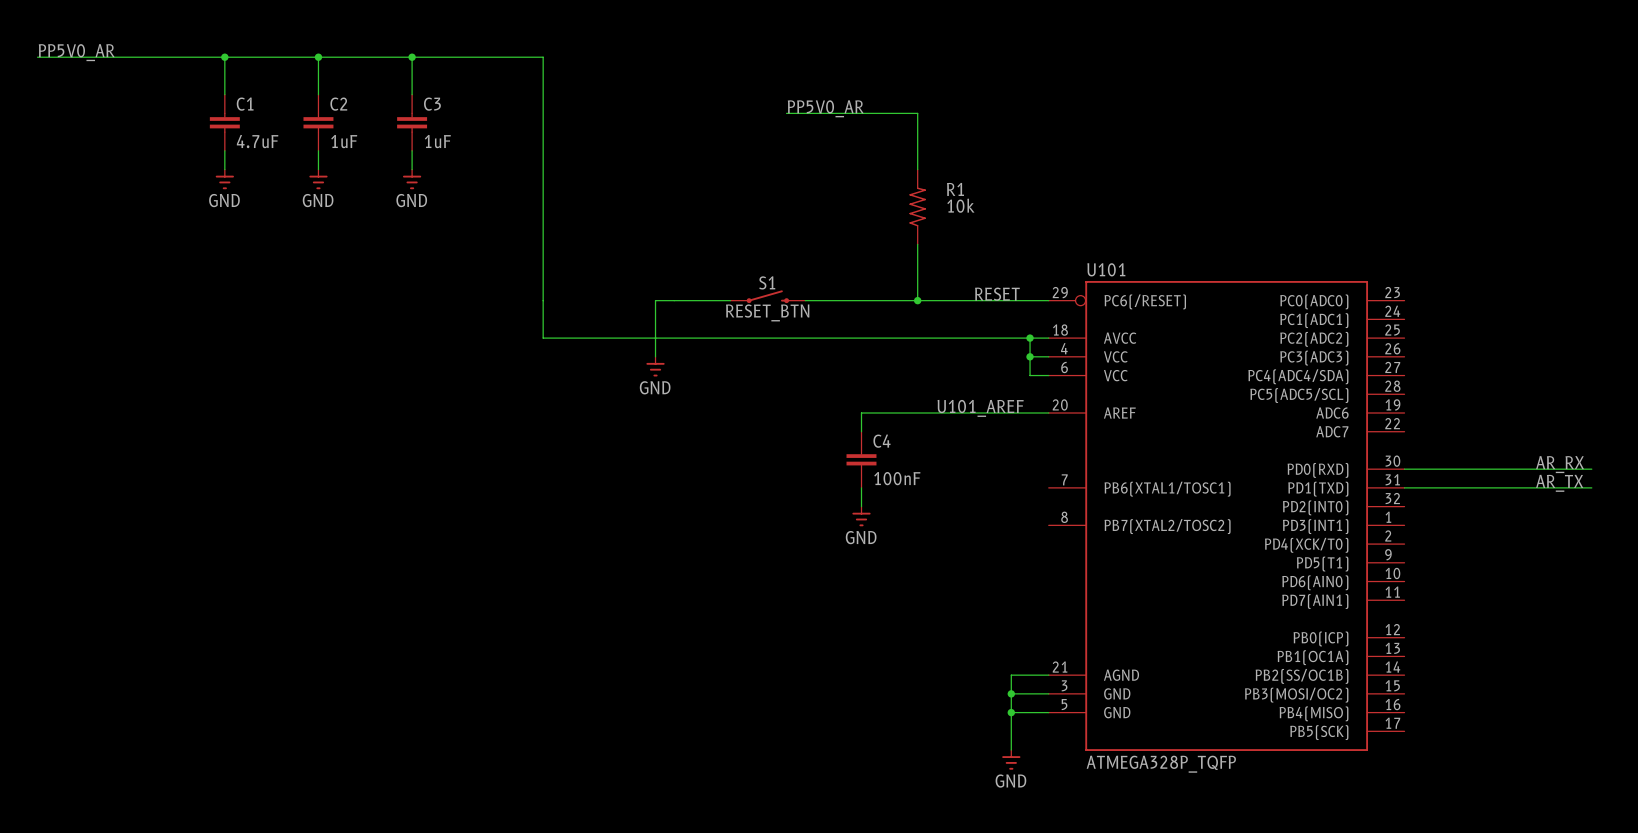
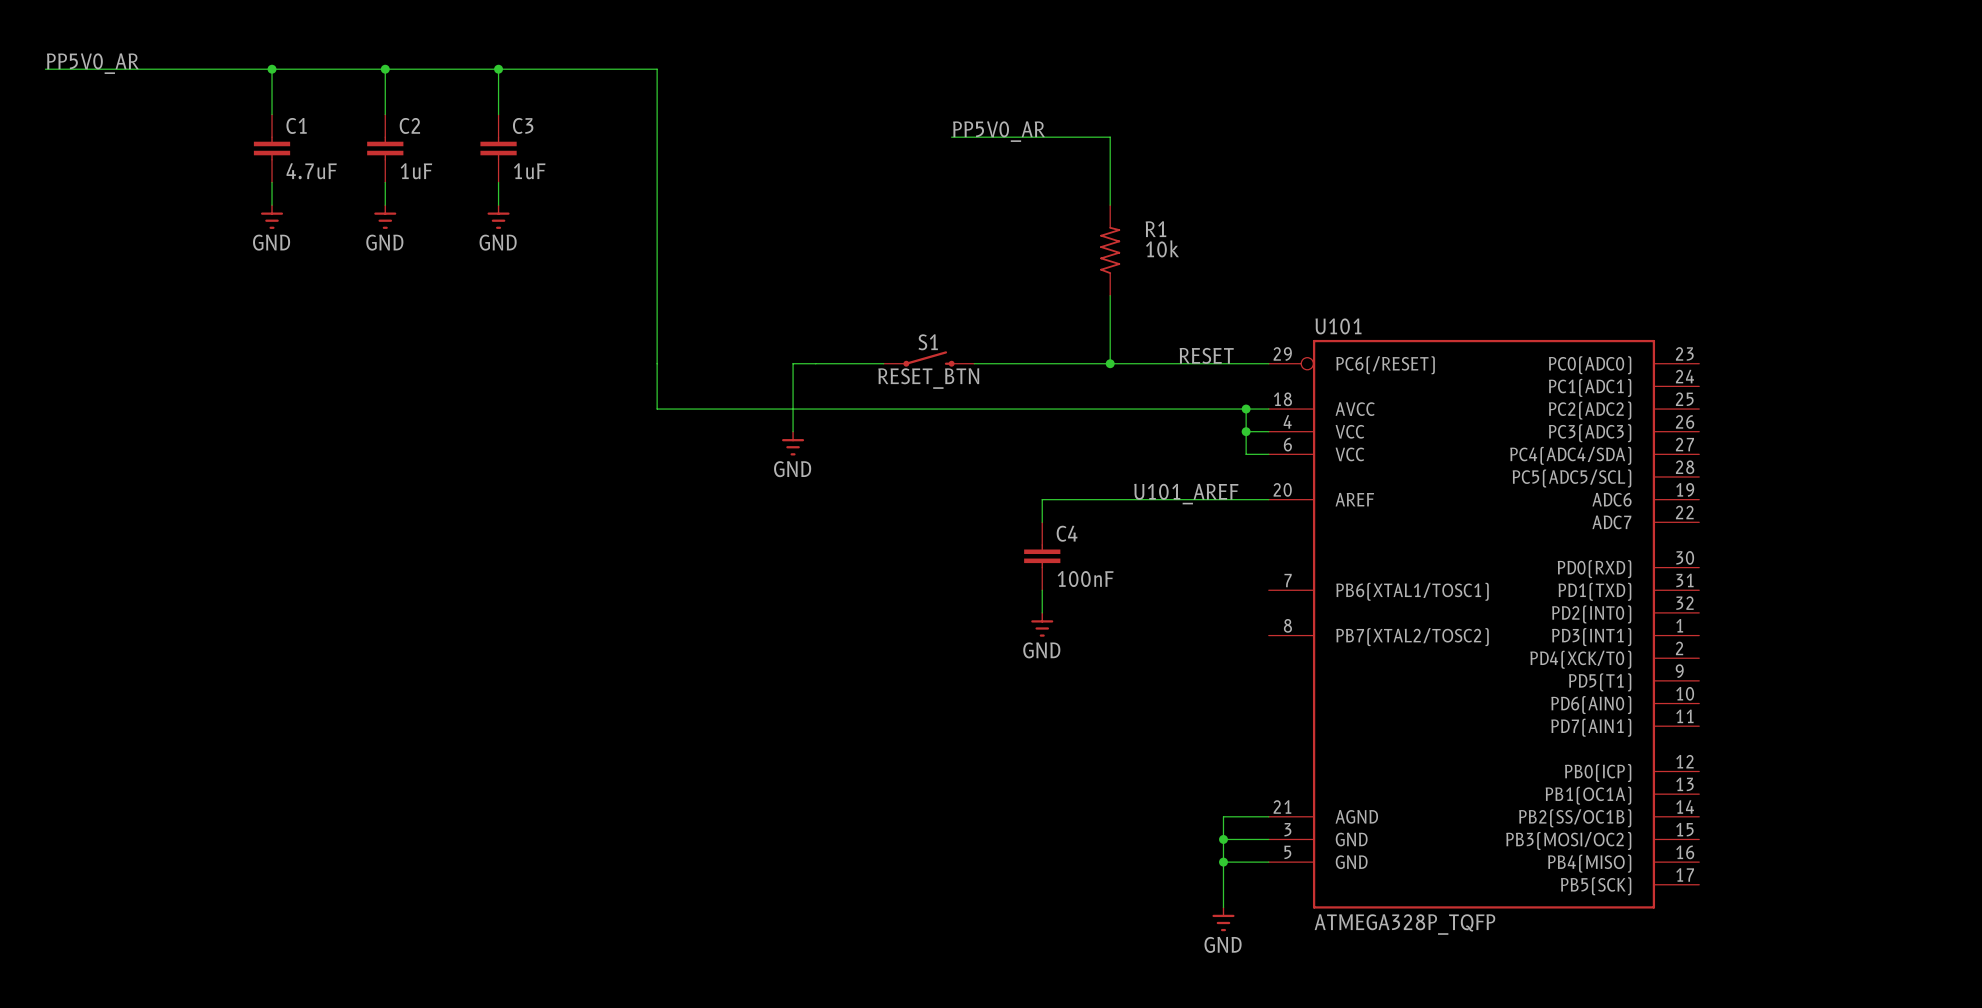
label: AR_RX (1560, 464) -> none
wire: (1404, 469) (1591, 469) -> none
label: AR_TX (1559, 483) -> none
wire: (1404, 487) (1591, 487) -> none

